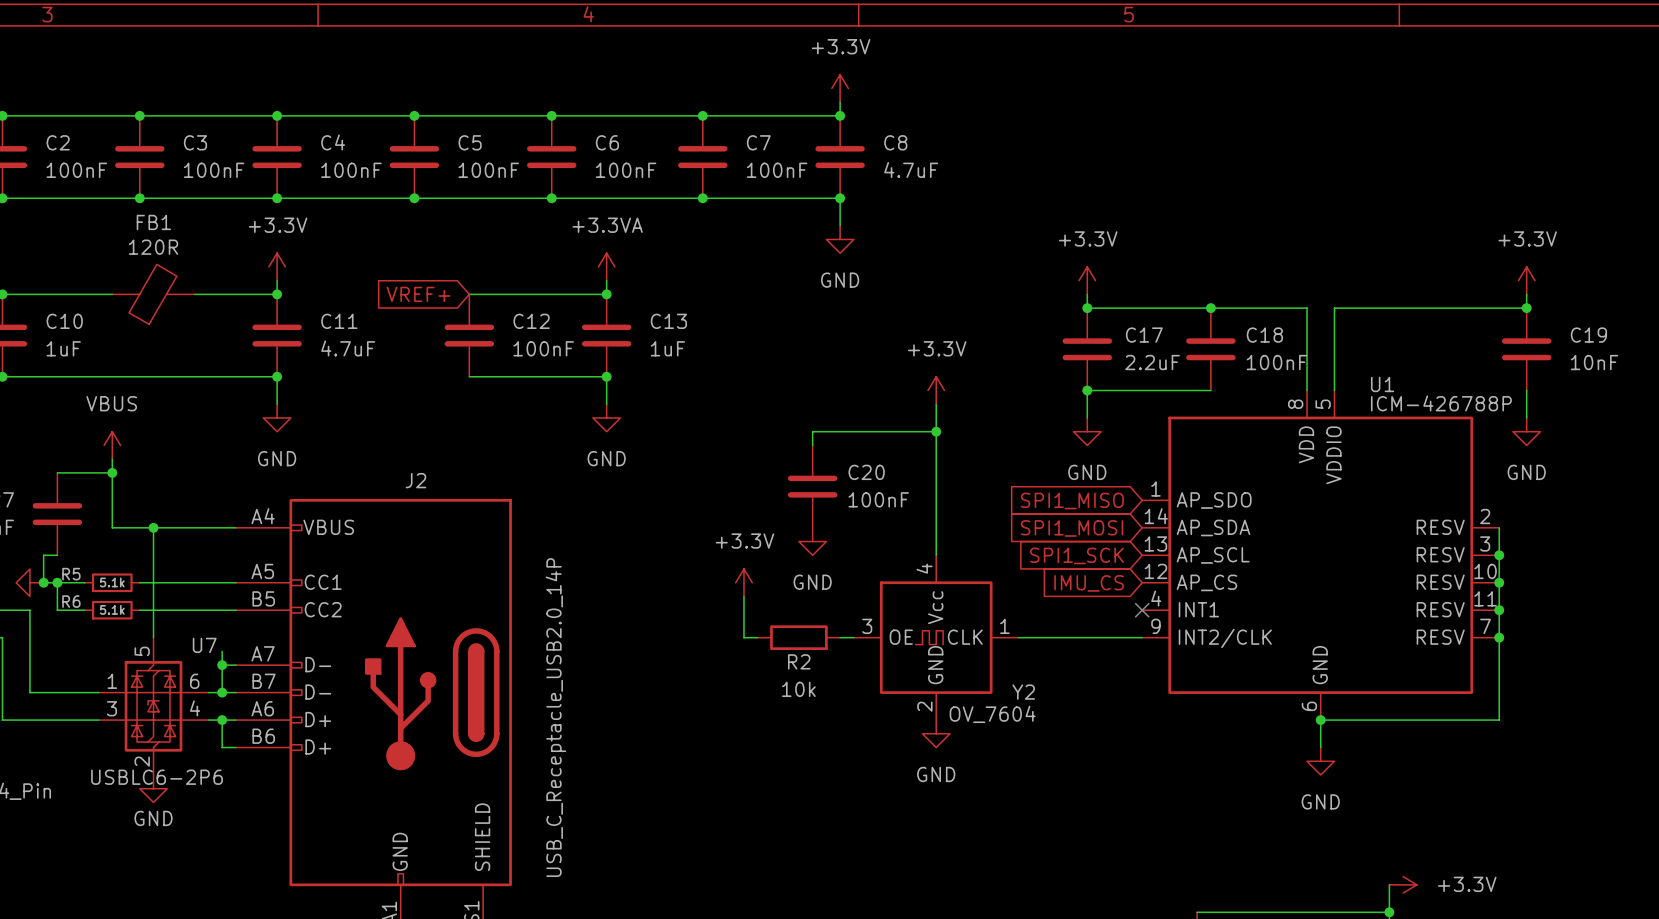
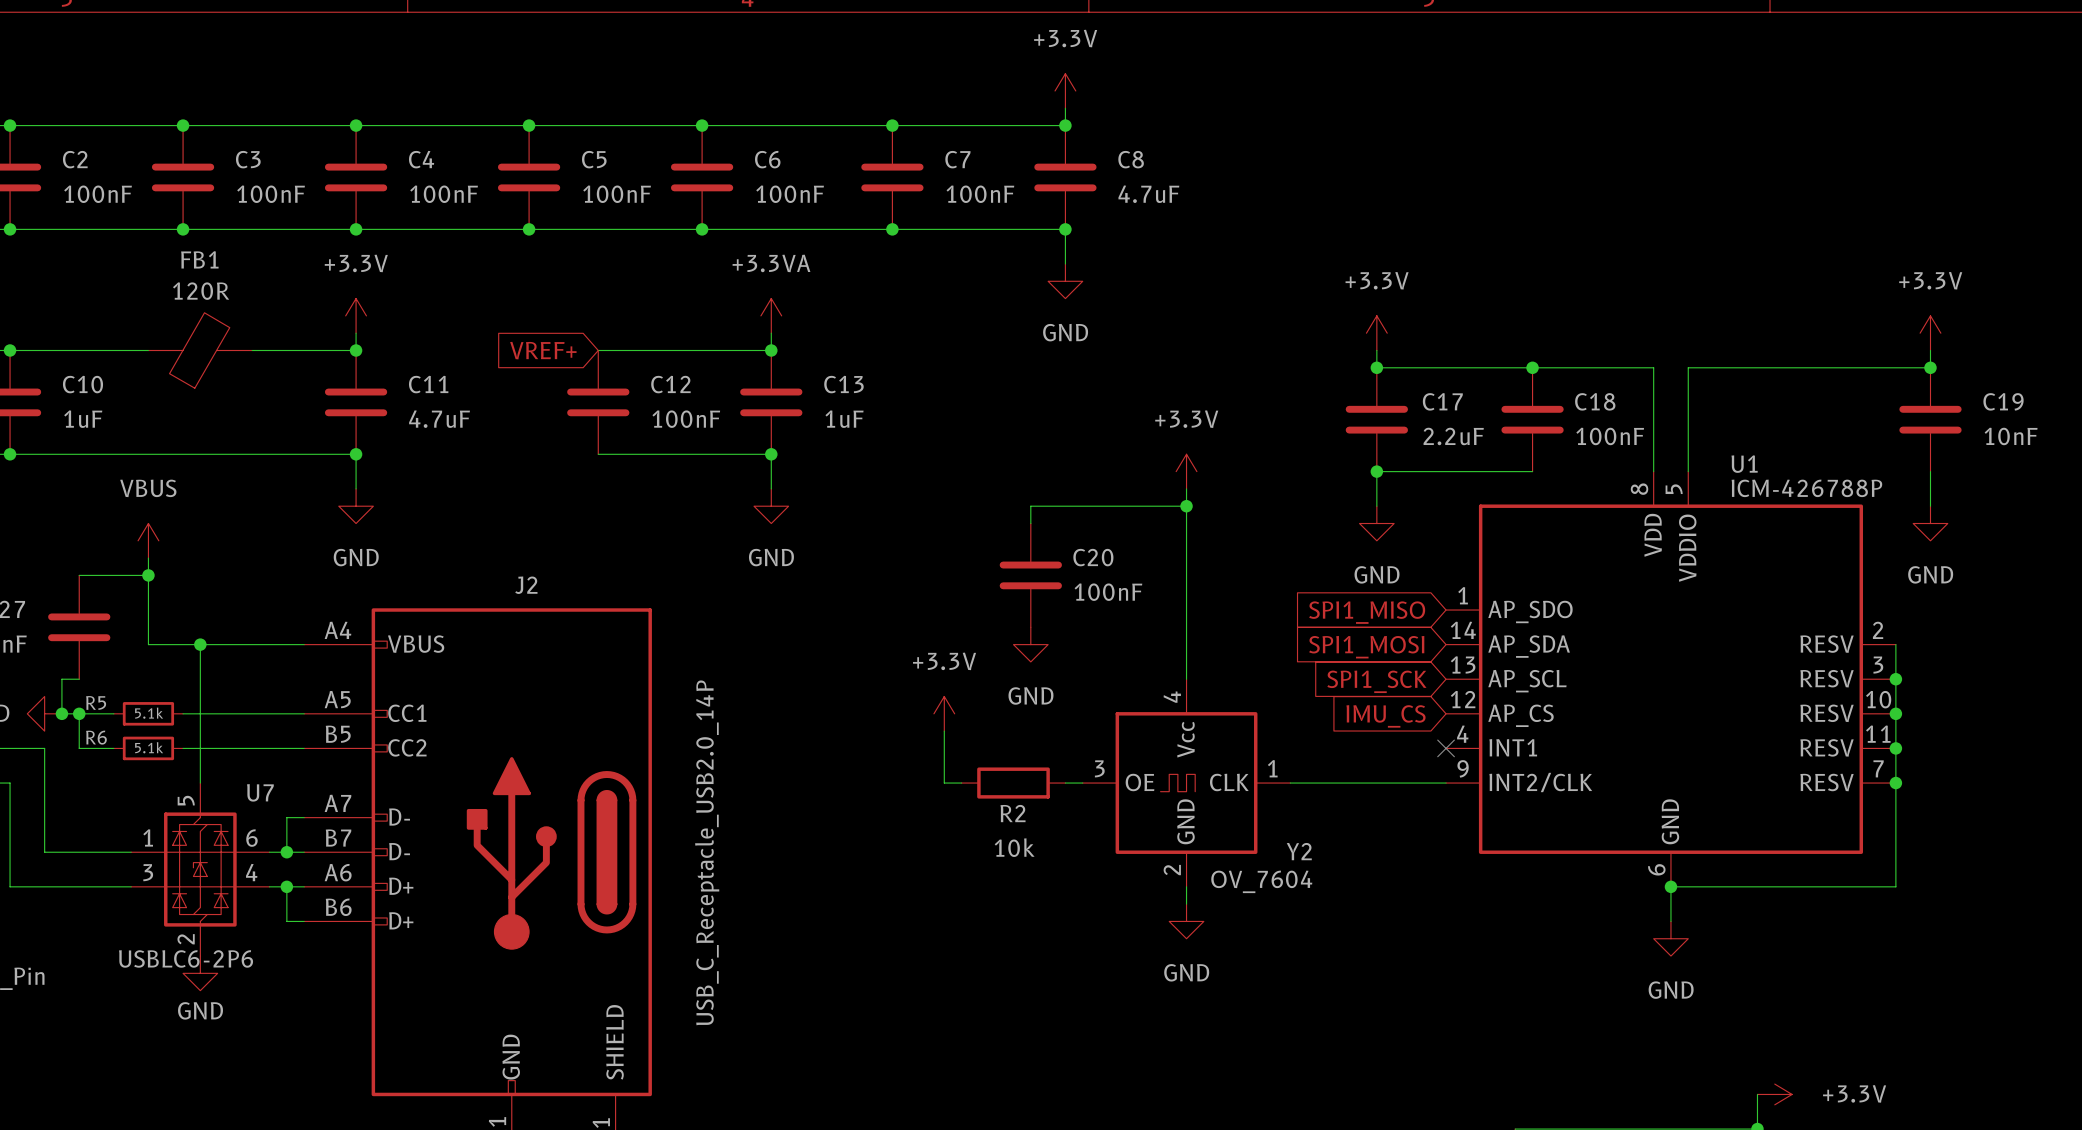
wire: (936, 431) (812, 431) (812, 445) -> (1186, 506) (1030, 506) (1030, 523)
junction position: (936, 431) -> (1186, 506)
C20 position: (812, 486) -> (1030, 575)
power symbol position: GND (812, 541) -> GND (1030, 644)
wire: (222, 651) (222, 665) -> none
junction: (222, 665) -> none
power symbol position: GND (936, 733) -> GND (1186, 921)

